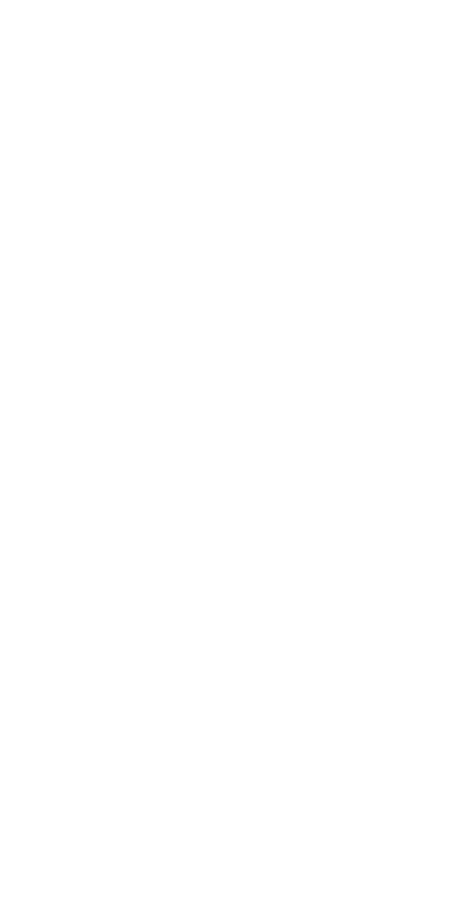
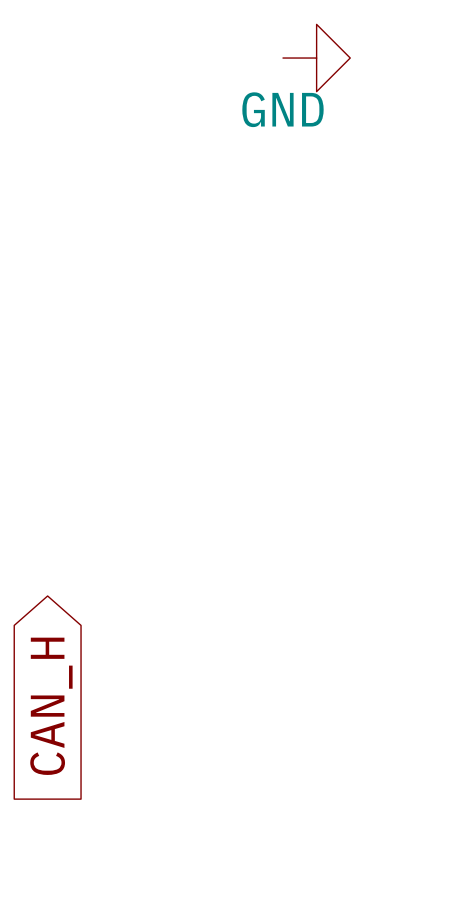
power symbol: none -> GND (316, 58)
global label: none -> CAN_H (51, 706)

